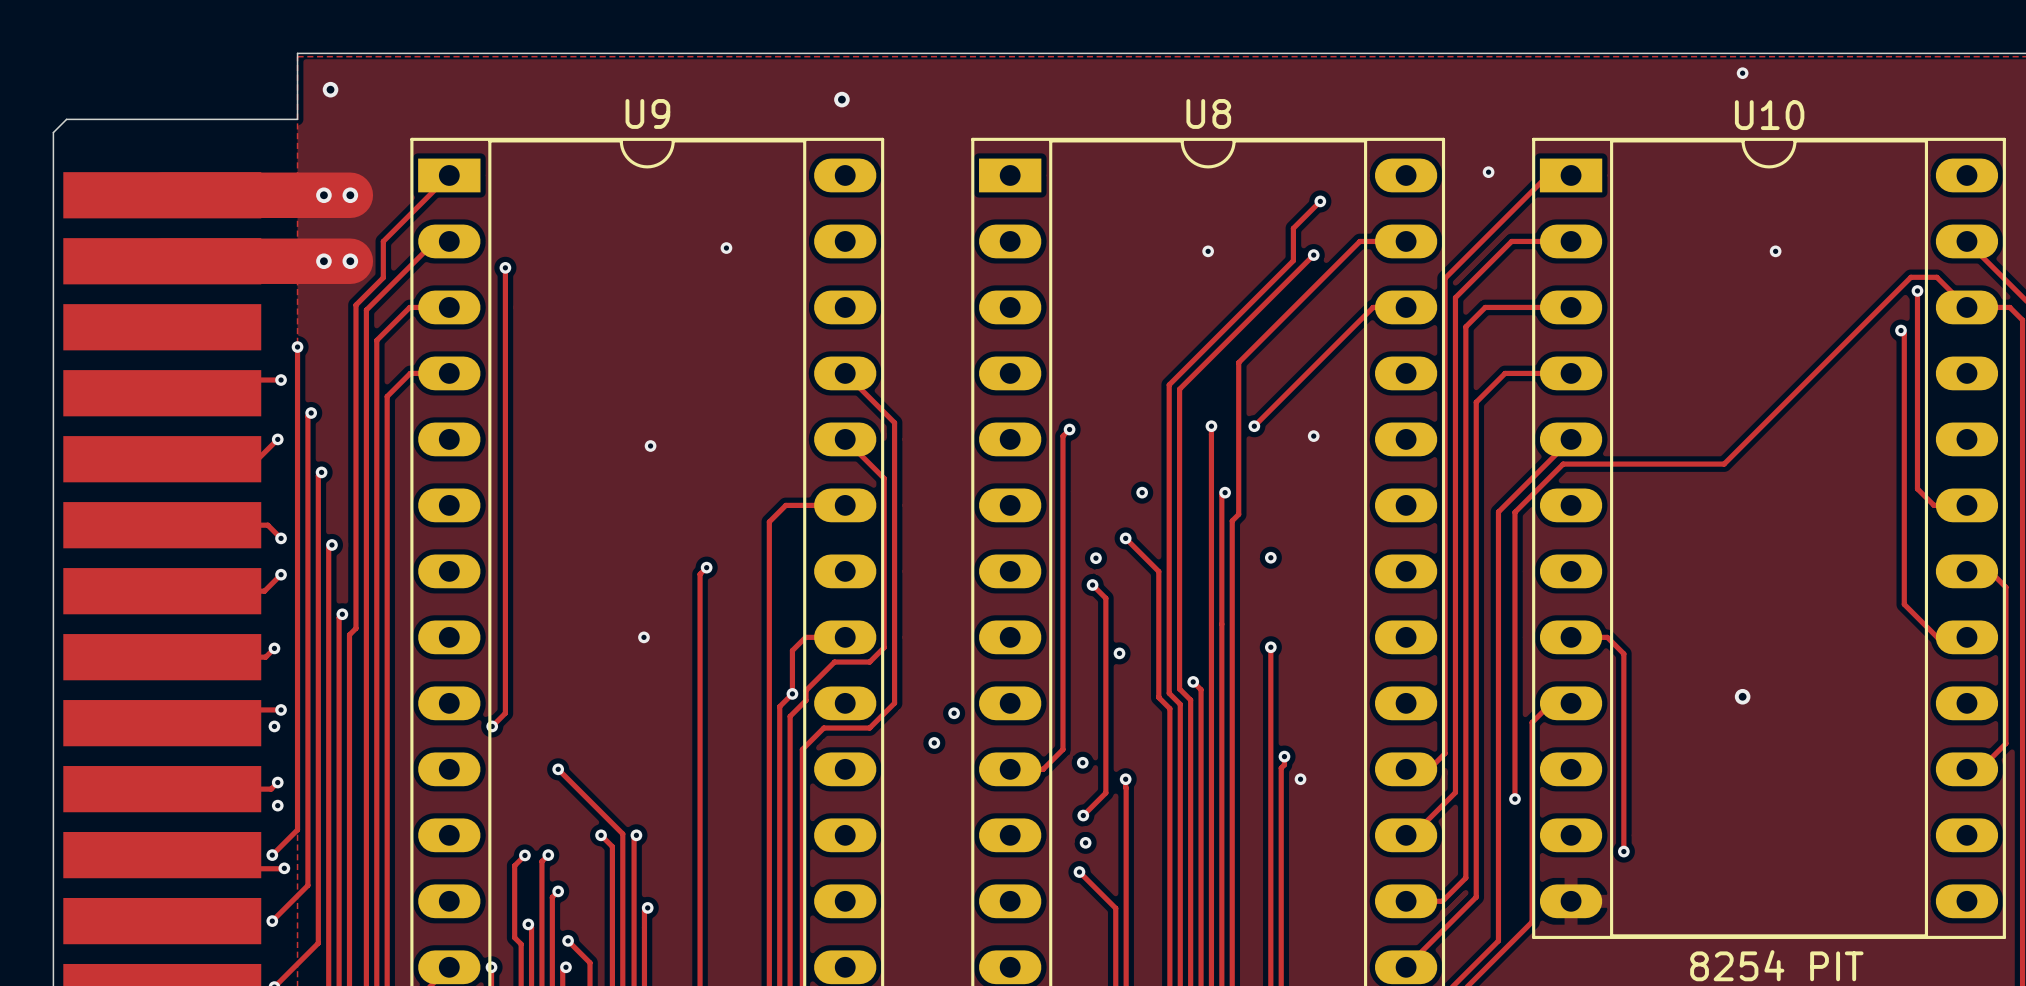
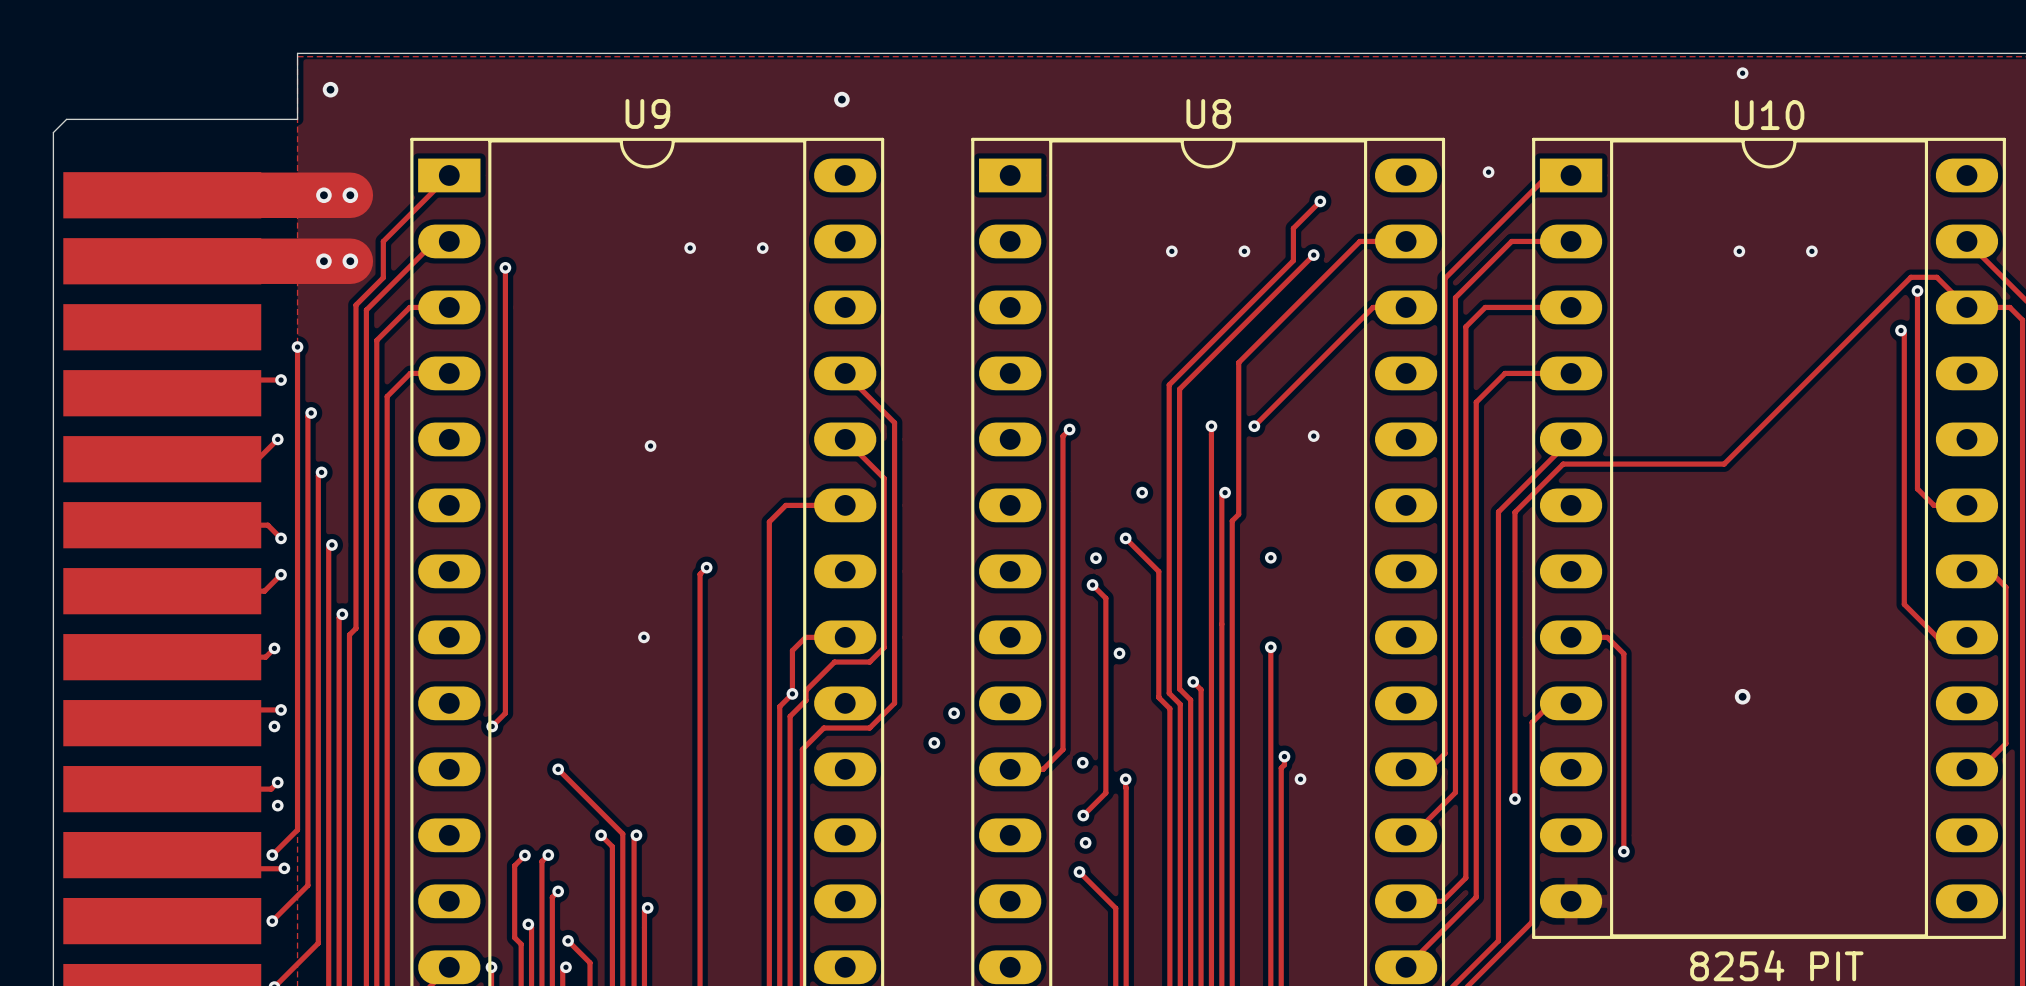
via: none -> (690, 248)
via: (726, 248) -> none
via: none -> (762, 248)
via: none -> (1171, 251)
via: (1208, 251) -> none
via: none -> (1244, 251)
via: none -> (1739, 251)
via: (1775, 251) -> none
via: none -> (1811, 251)

